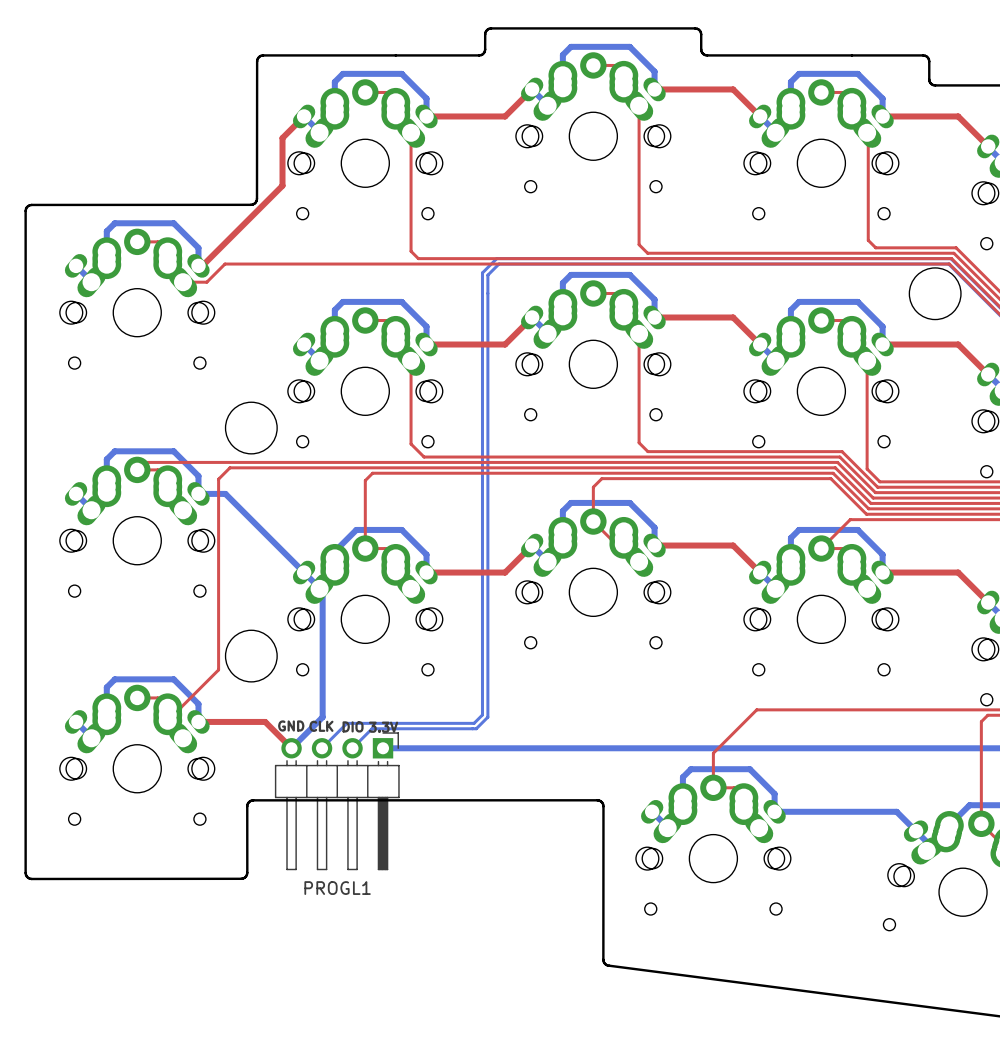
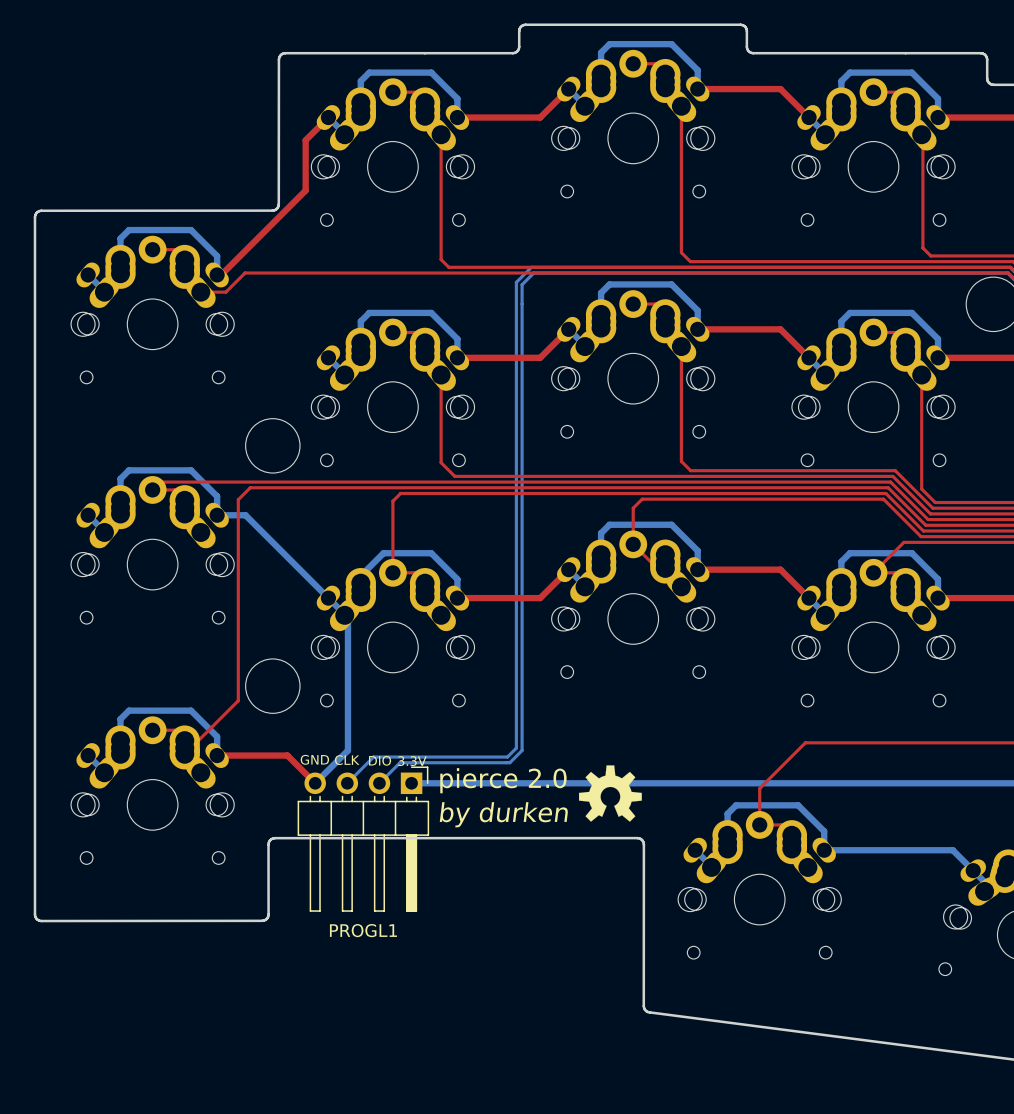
drawing: none -> [579, 765, 642, 822]
text: none -> pierce 2.0 (503, 780)
text: none -> by durken (503, 814)

